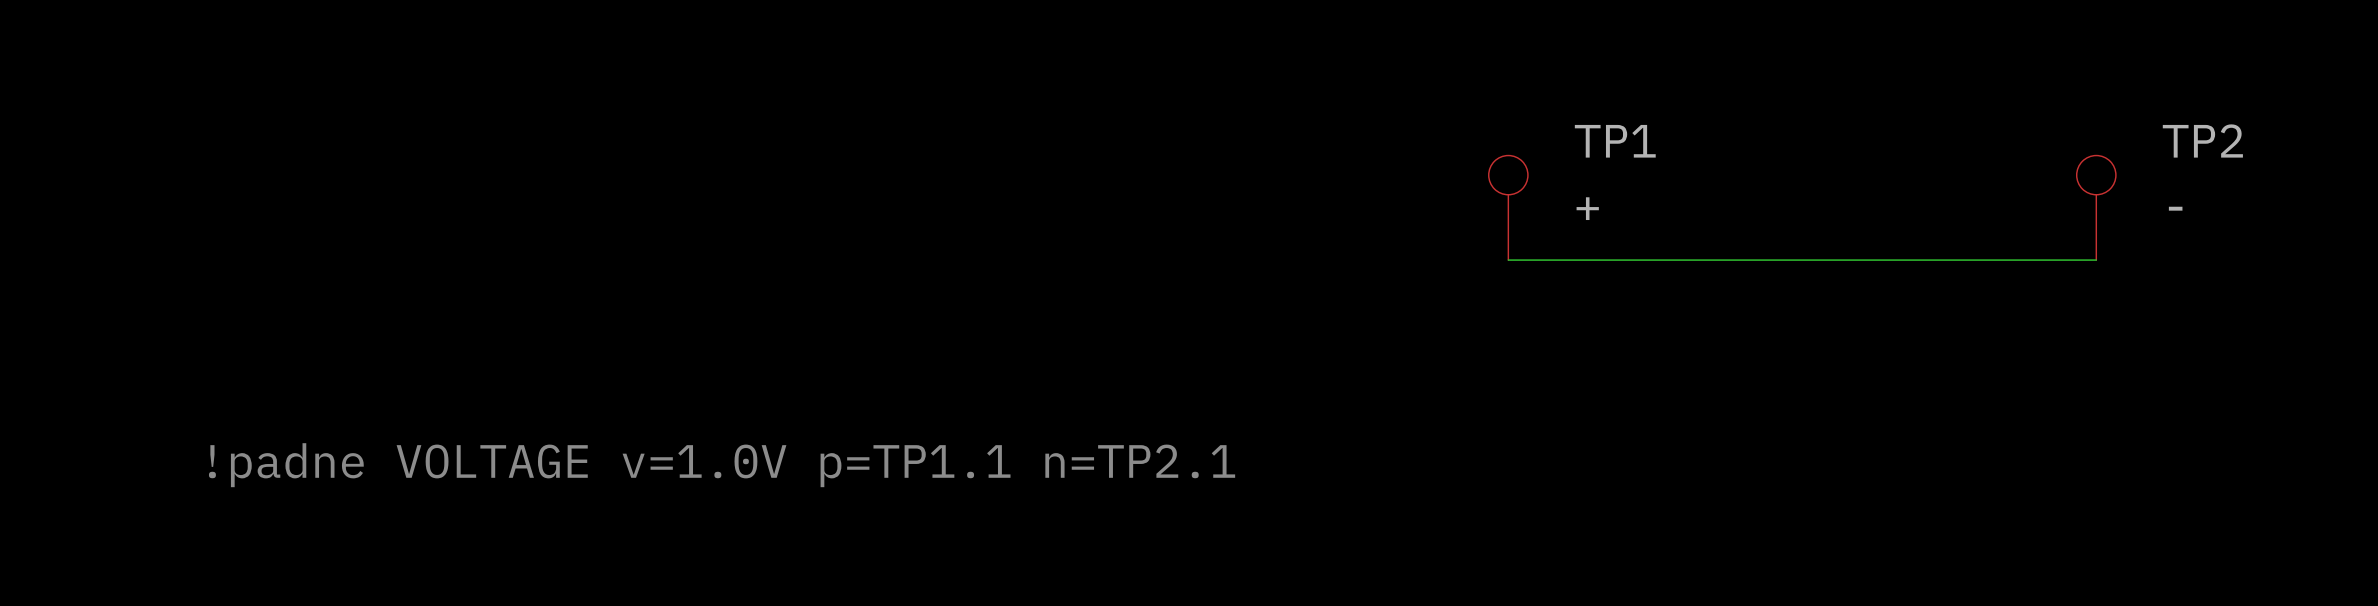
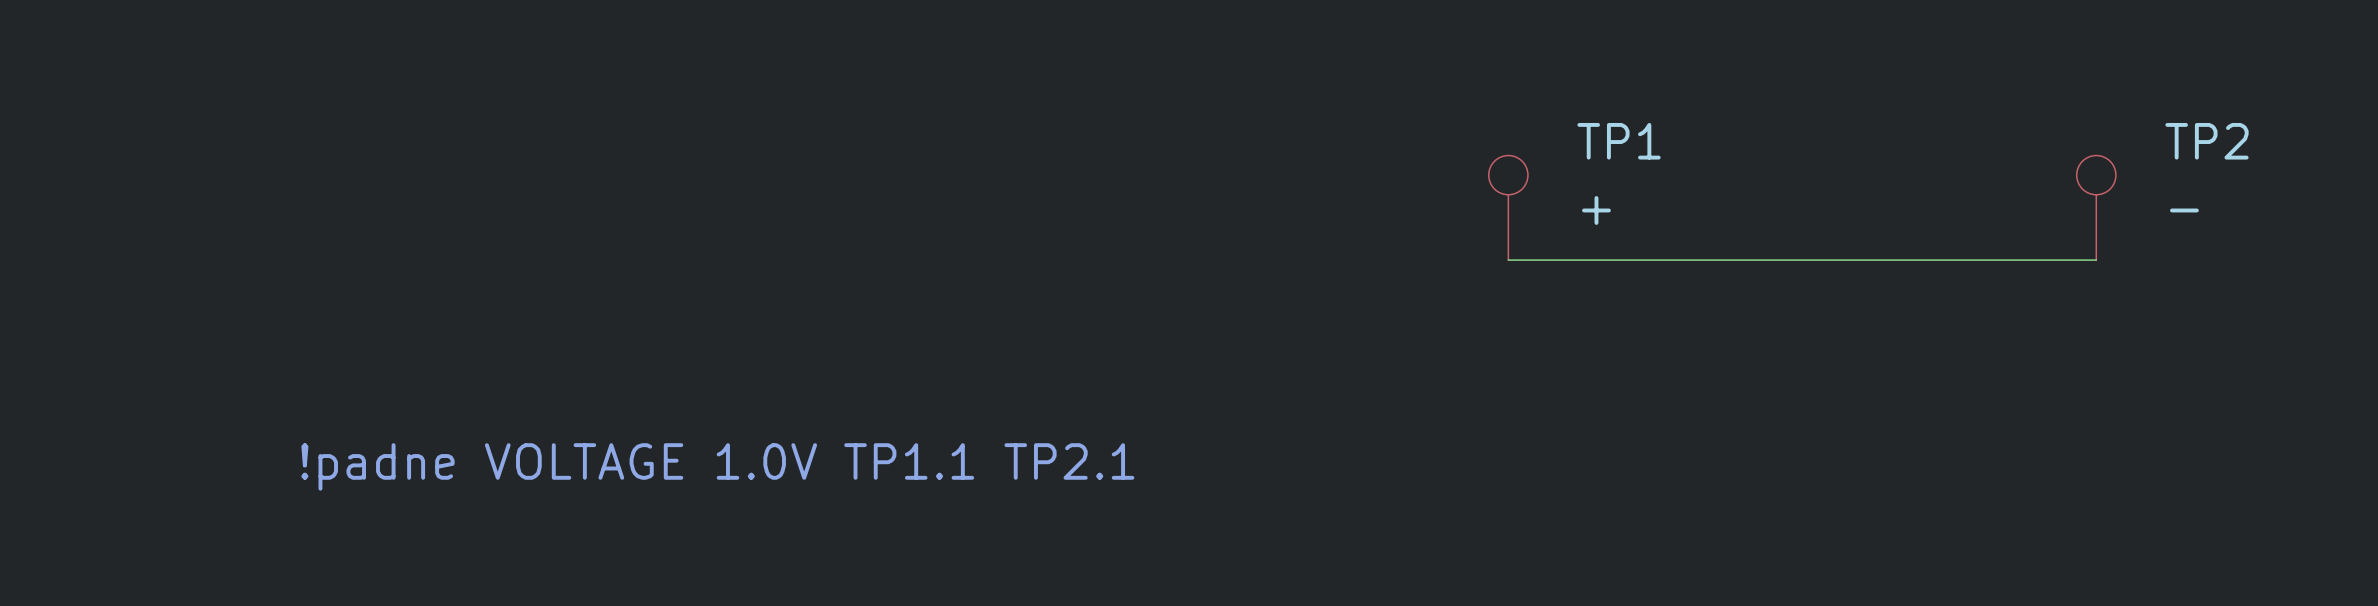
text: !padne VOLTAGE v=1.0V p=TP1.1 n=TP2.1 (722, 465) -> !padne VOLTAGE 1.0V TP1.1 TP2.1 (717, 466)

